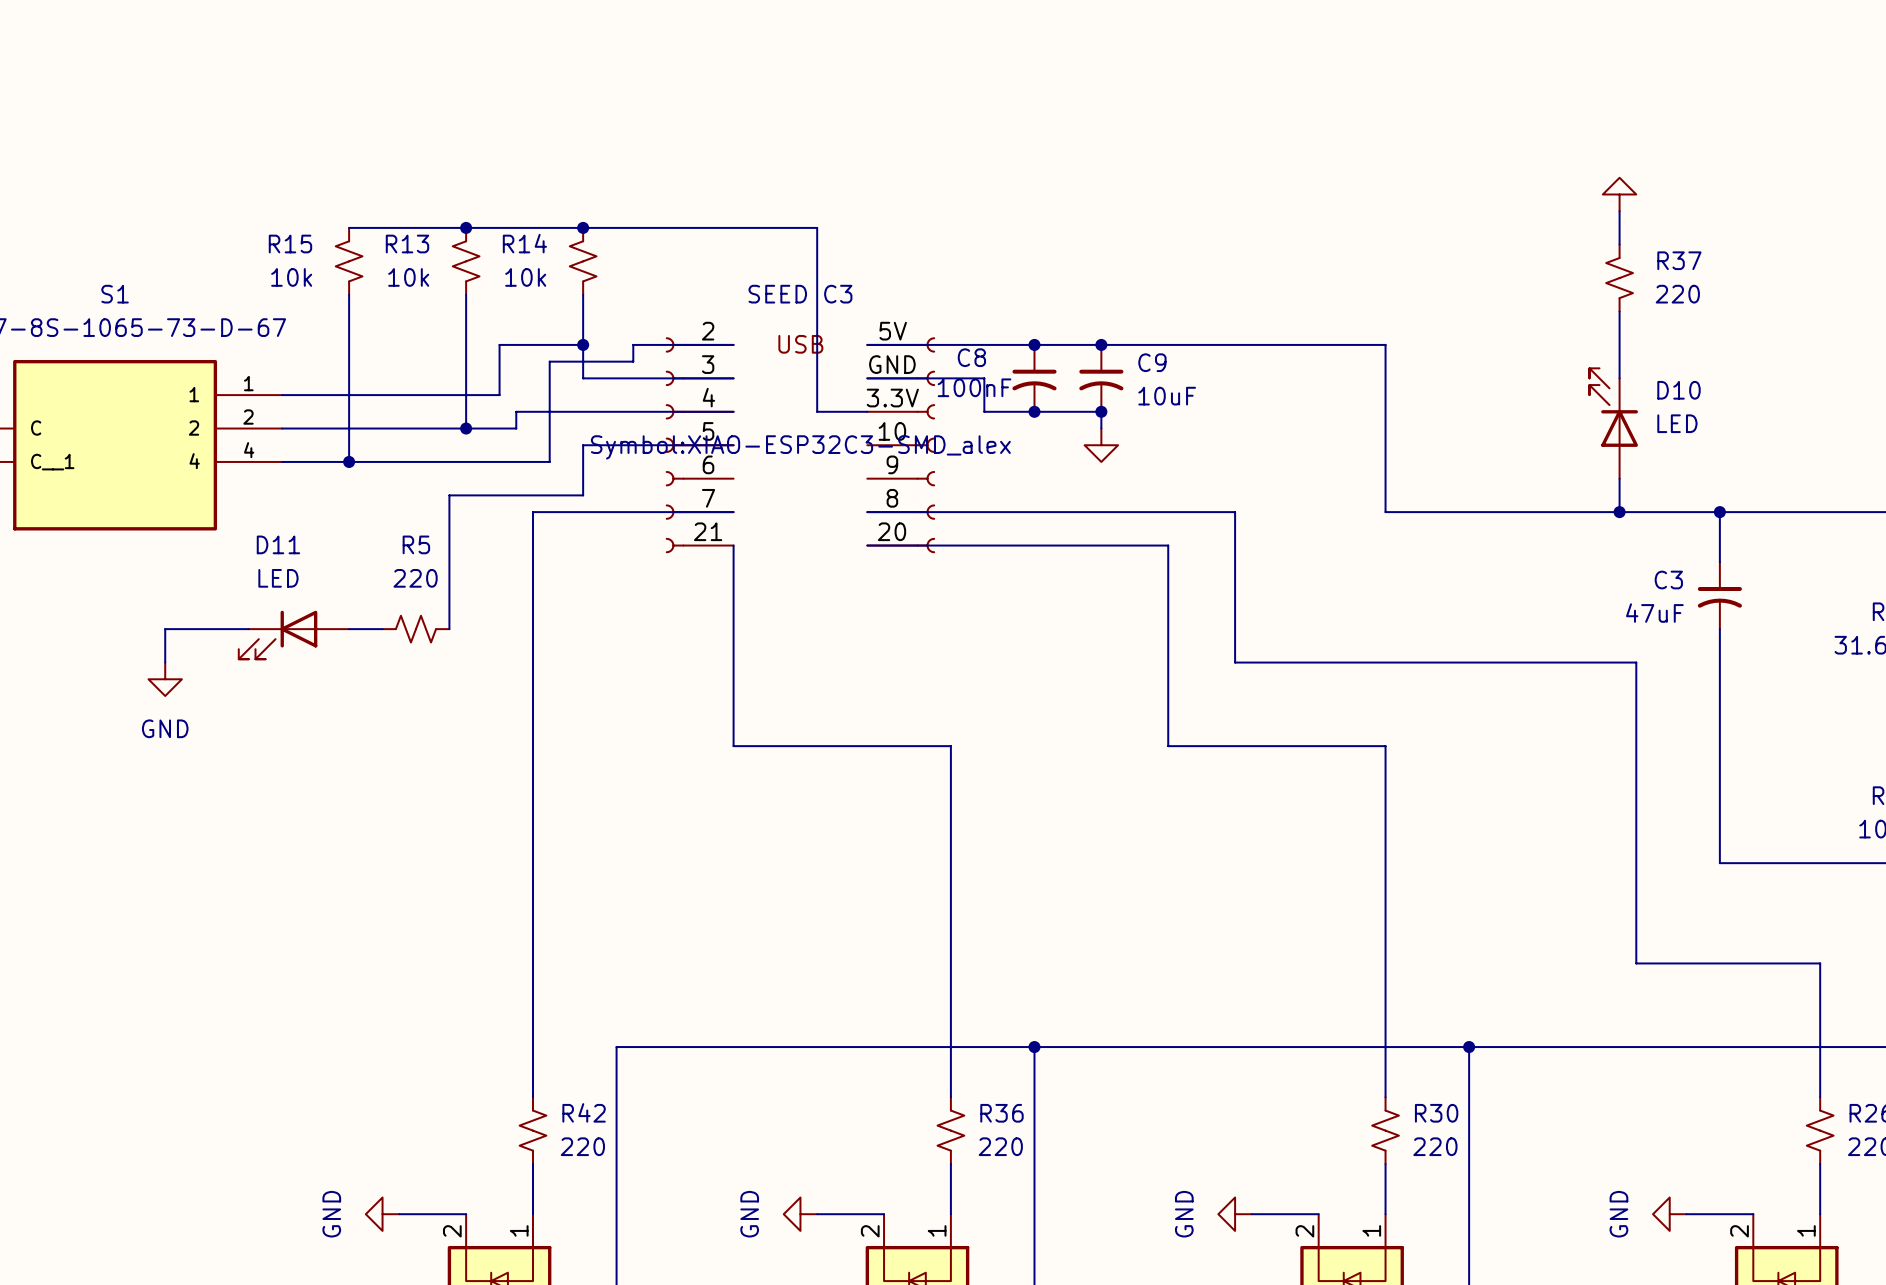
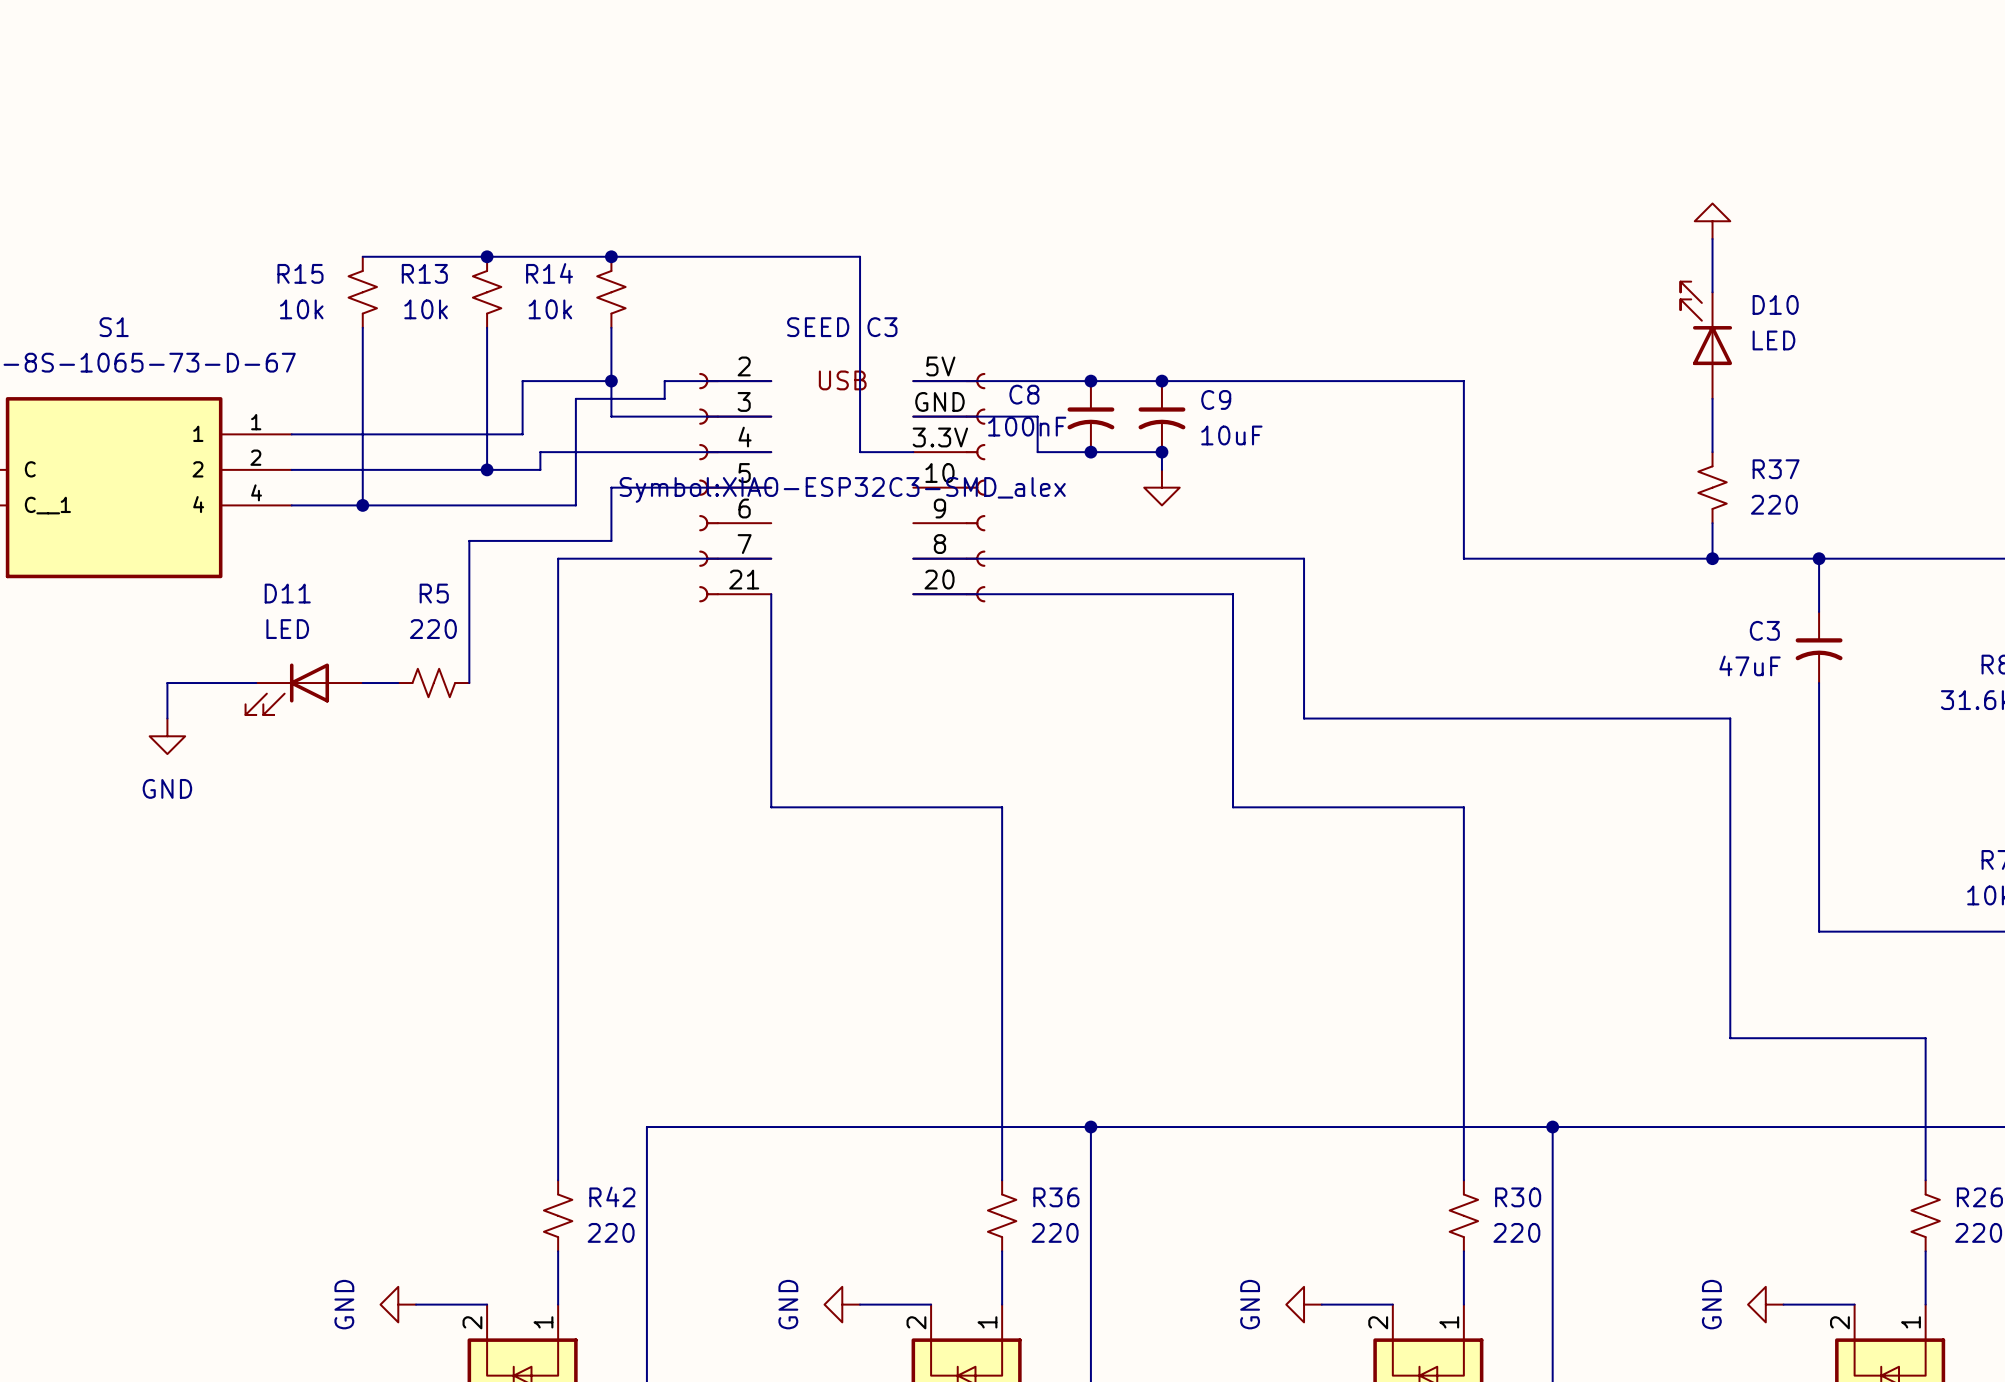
R37 position: (1619, 278) -> (1712, 487)
D10 position: (1613, 423) -> (1706, 340)

